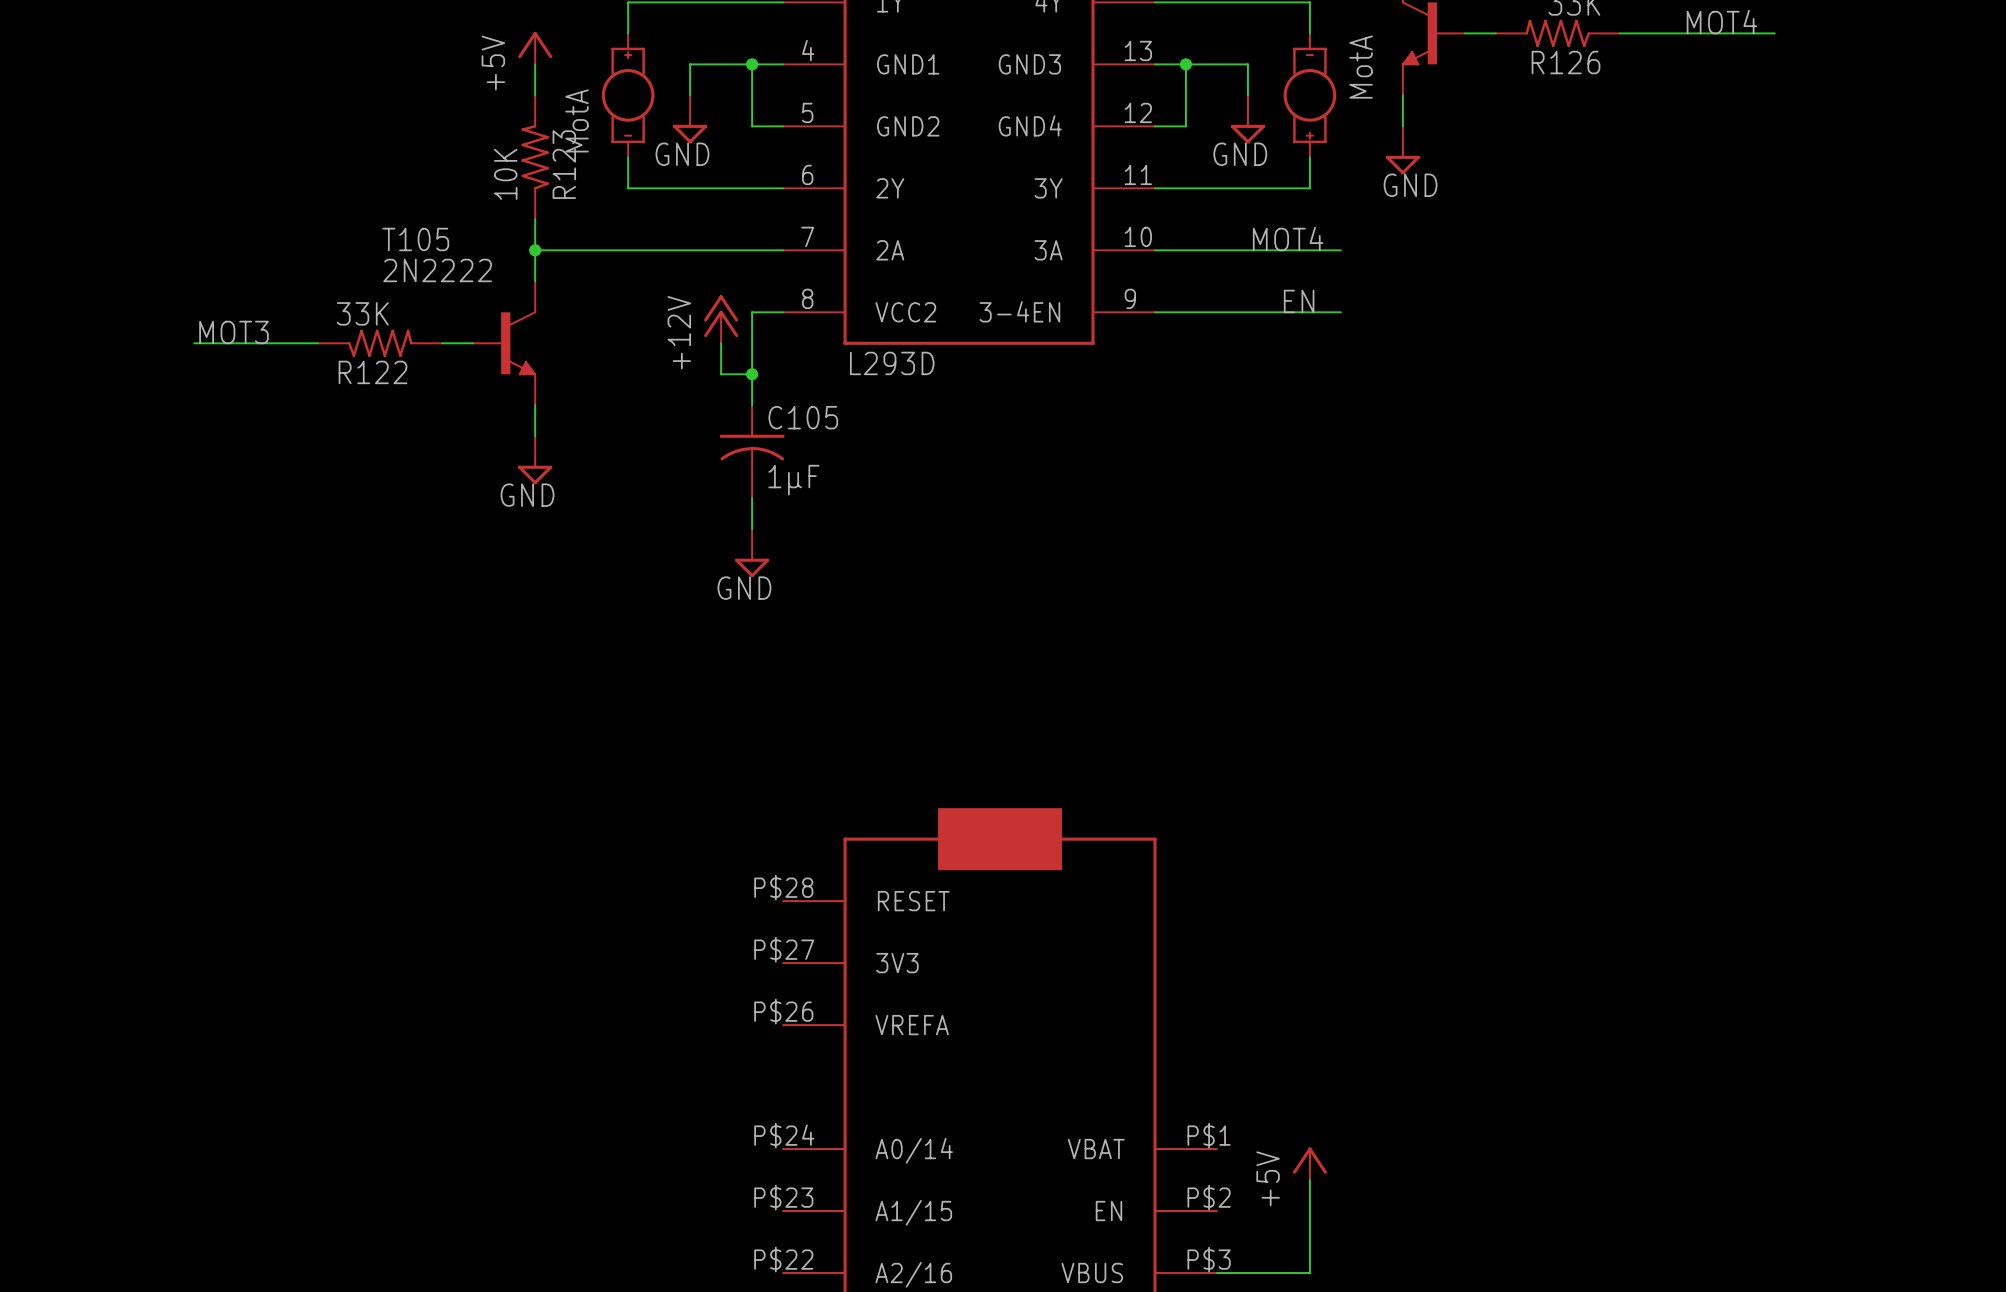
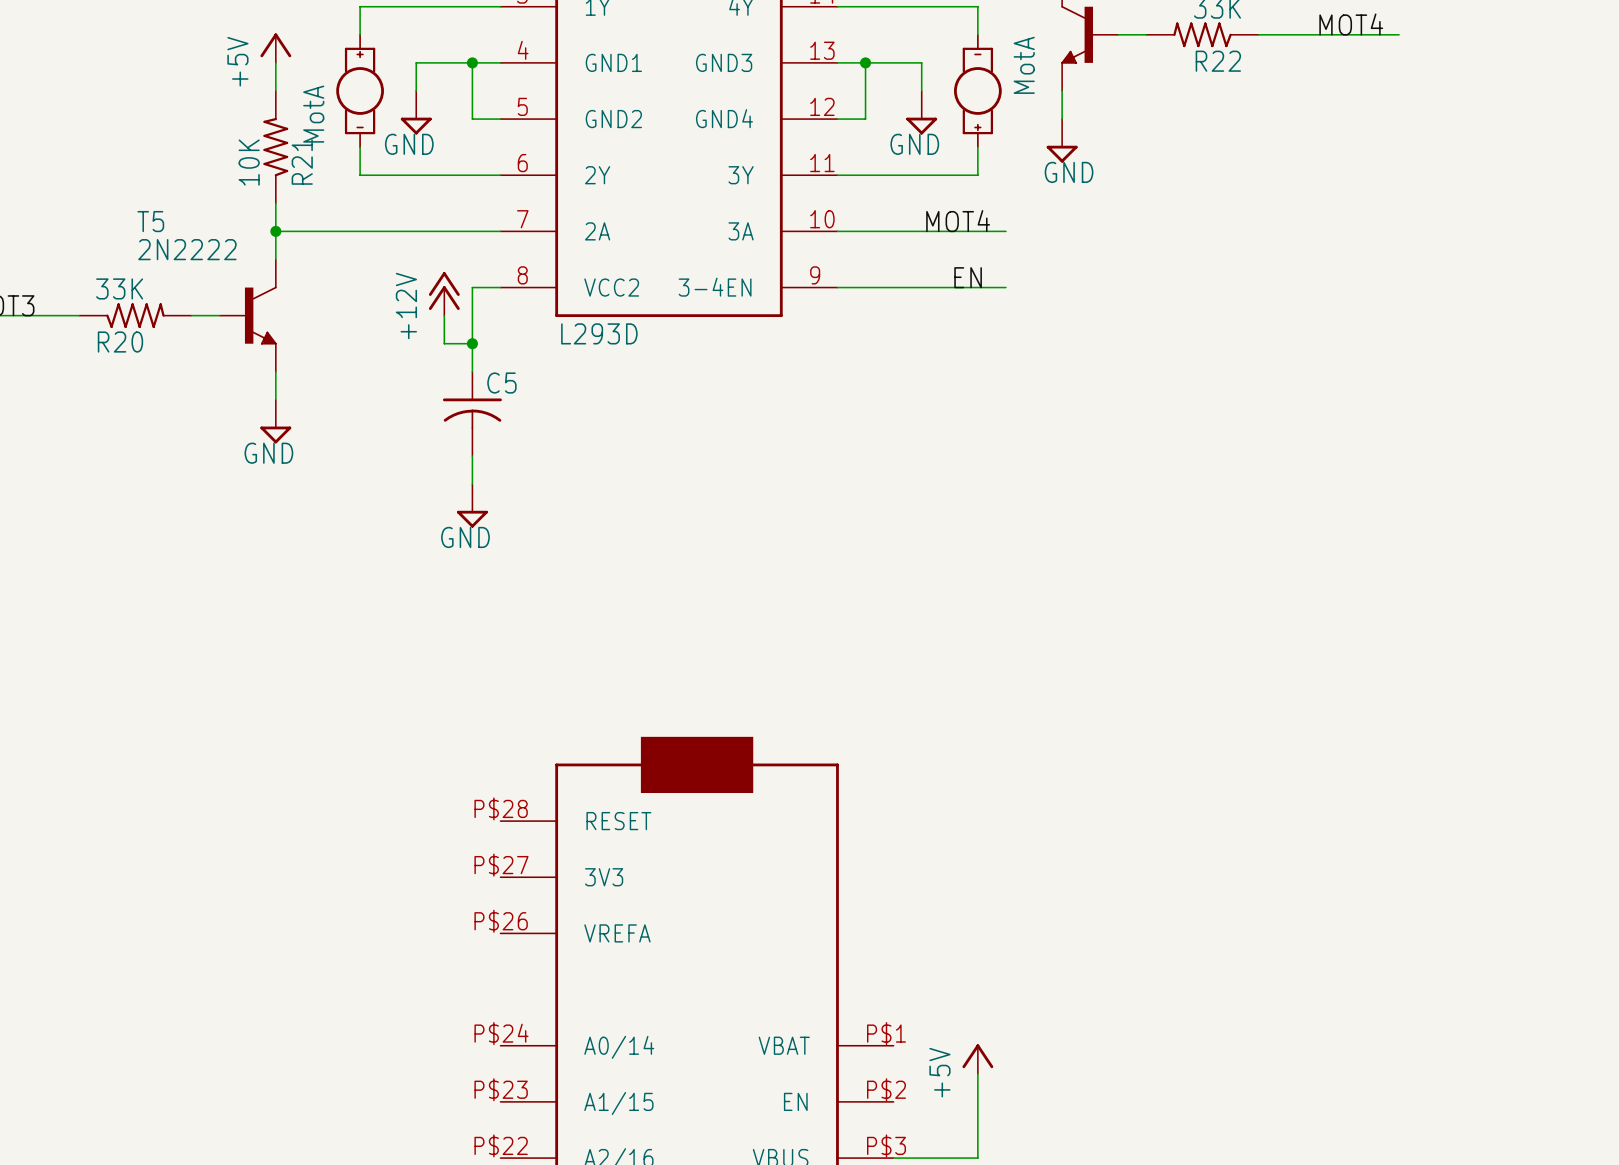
R126 name: R126 (1565, 62) -> R22 (1218, 61)
R123 name: R123 (564, 164) -> R21 (302, 162)
T105 name: T105 (415, 239) -> T5 (150, 221)
R122 name: R122 (373, 372) -> R20 (120, 342)
C105 name: C105 (803, 417) -> C5 (501, 383)
C105 value: 1µF (794, 480) -> none

